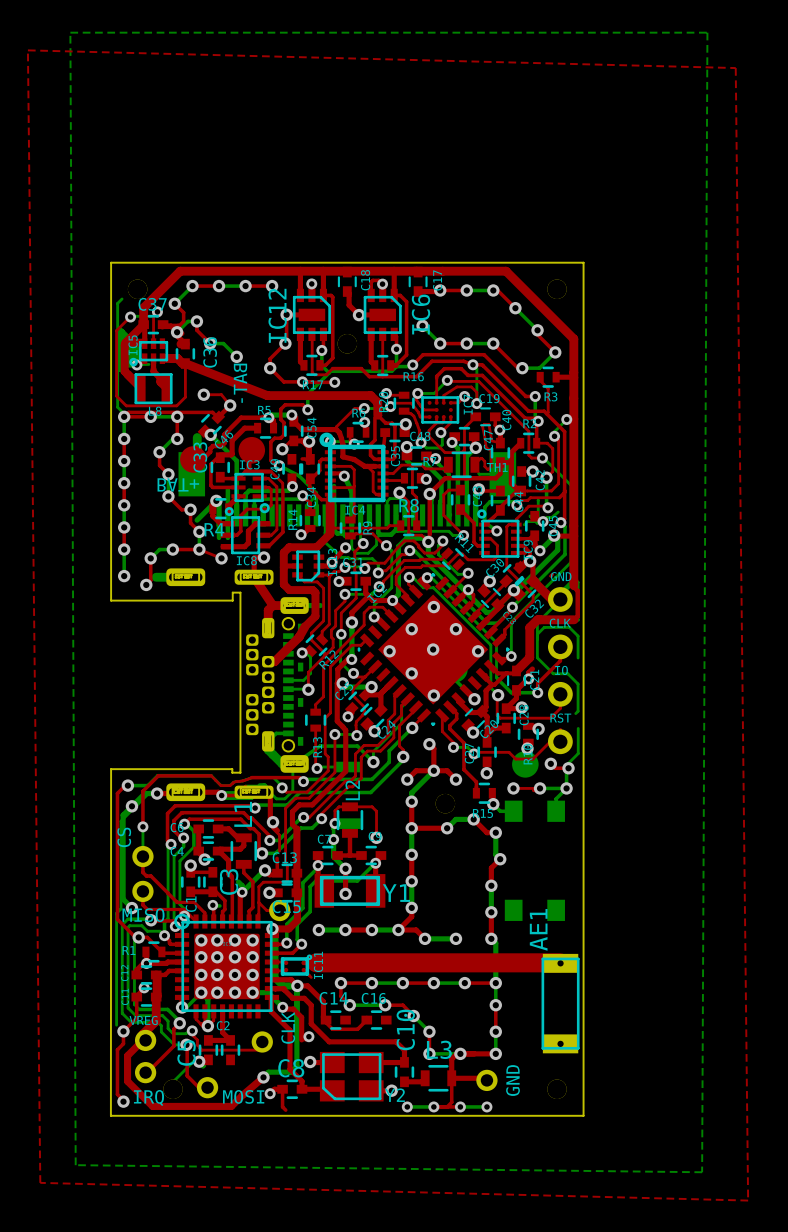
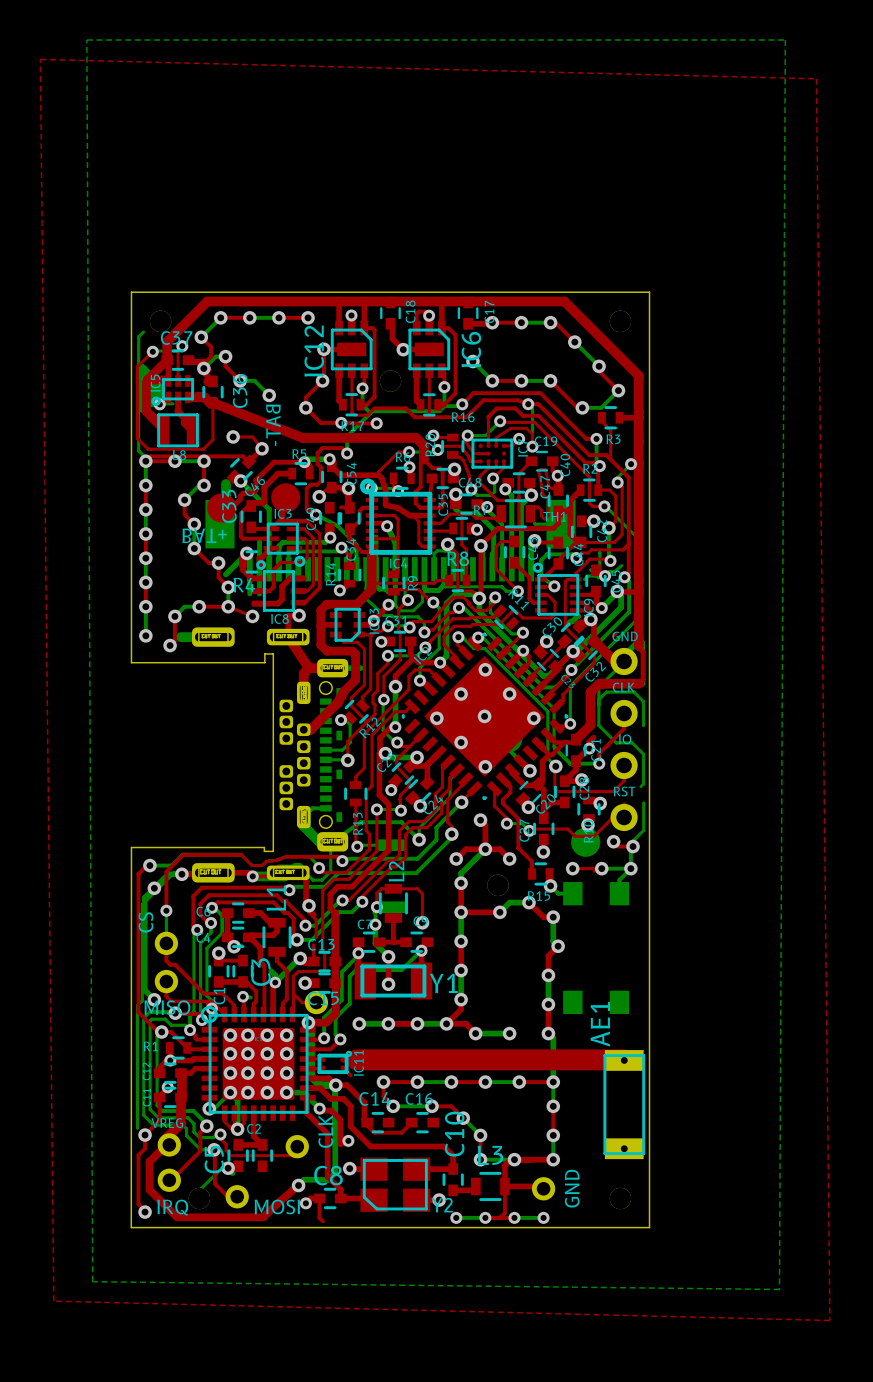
bottom track: none -> (578, 616) (572, 621)
bottom track: none -> (570, 621) (568, 623)

